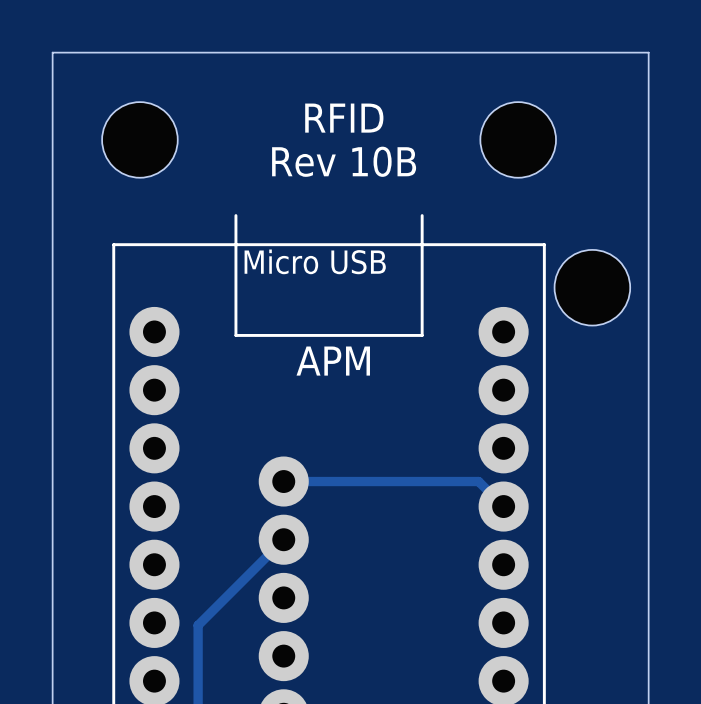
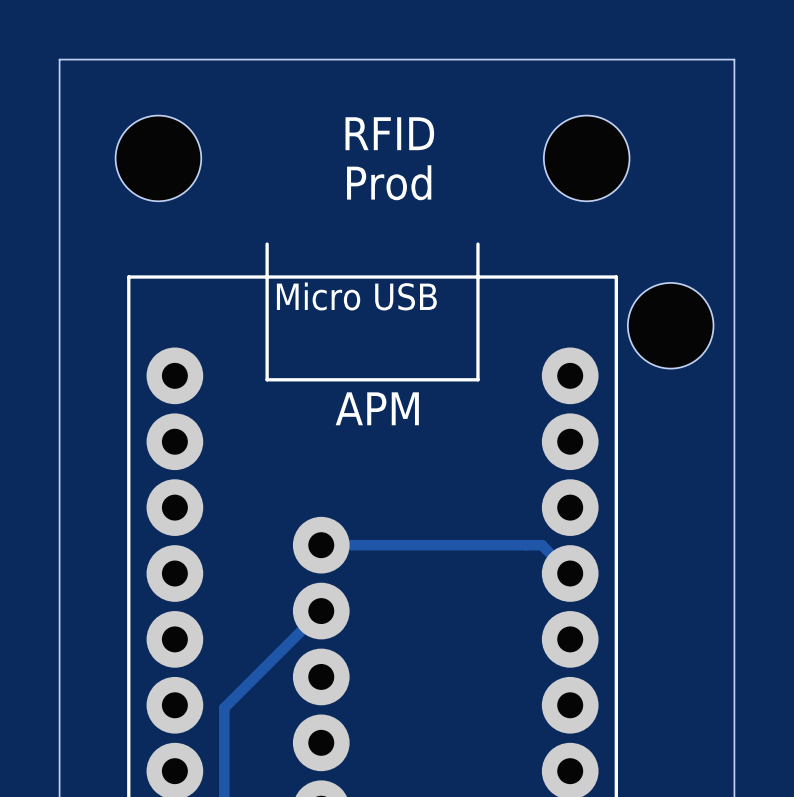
text: Rev 10B (344, 161) -> Prod (389, 182)

